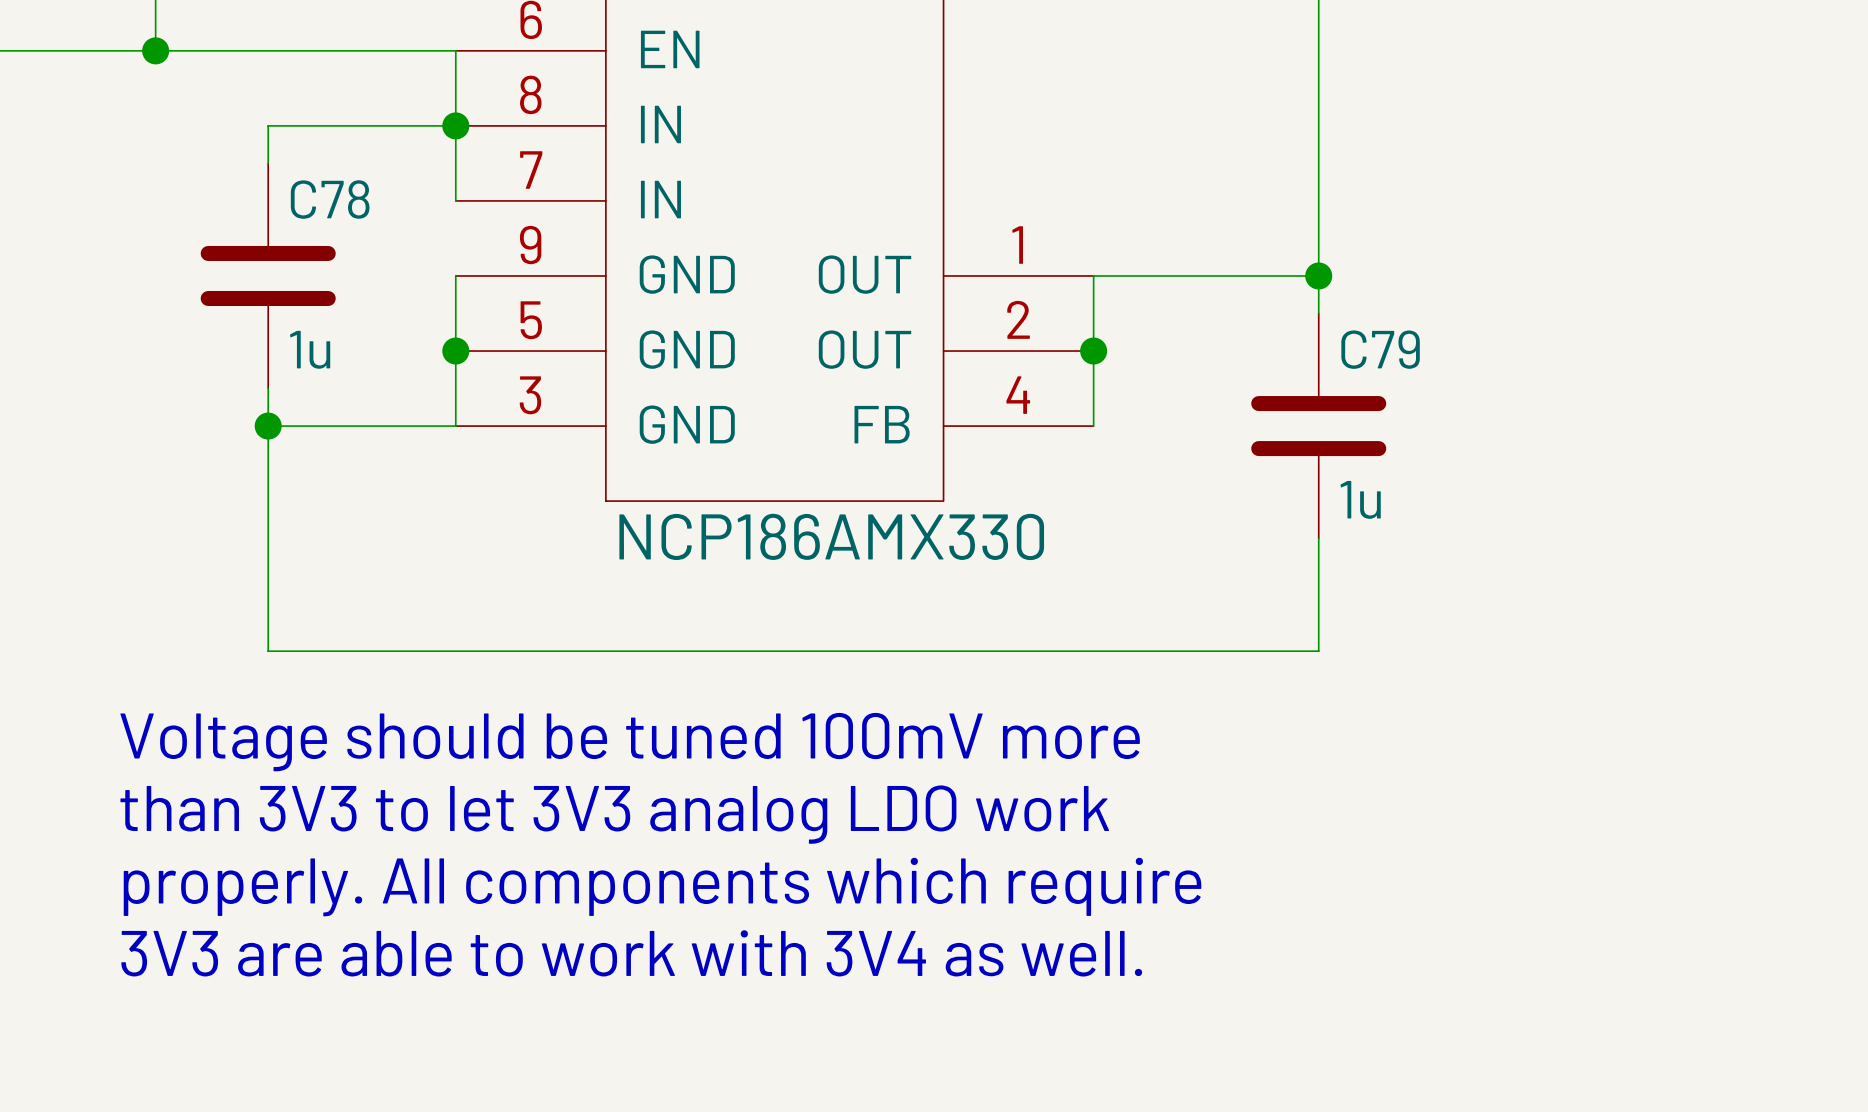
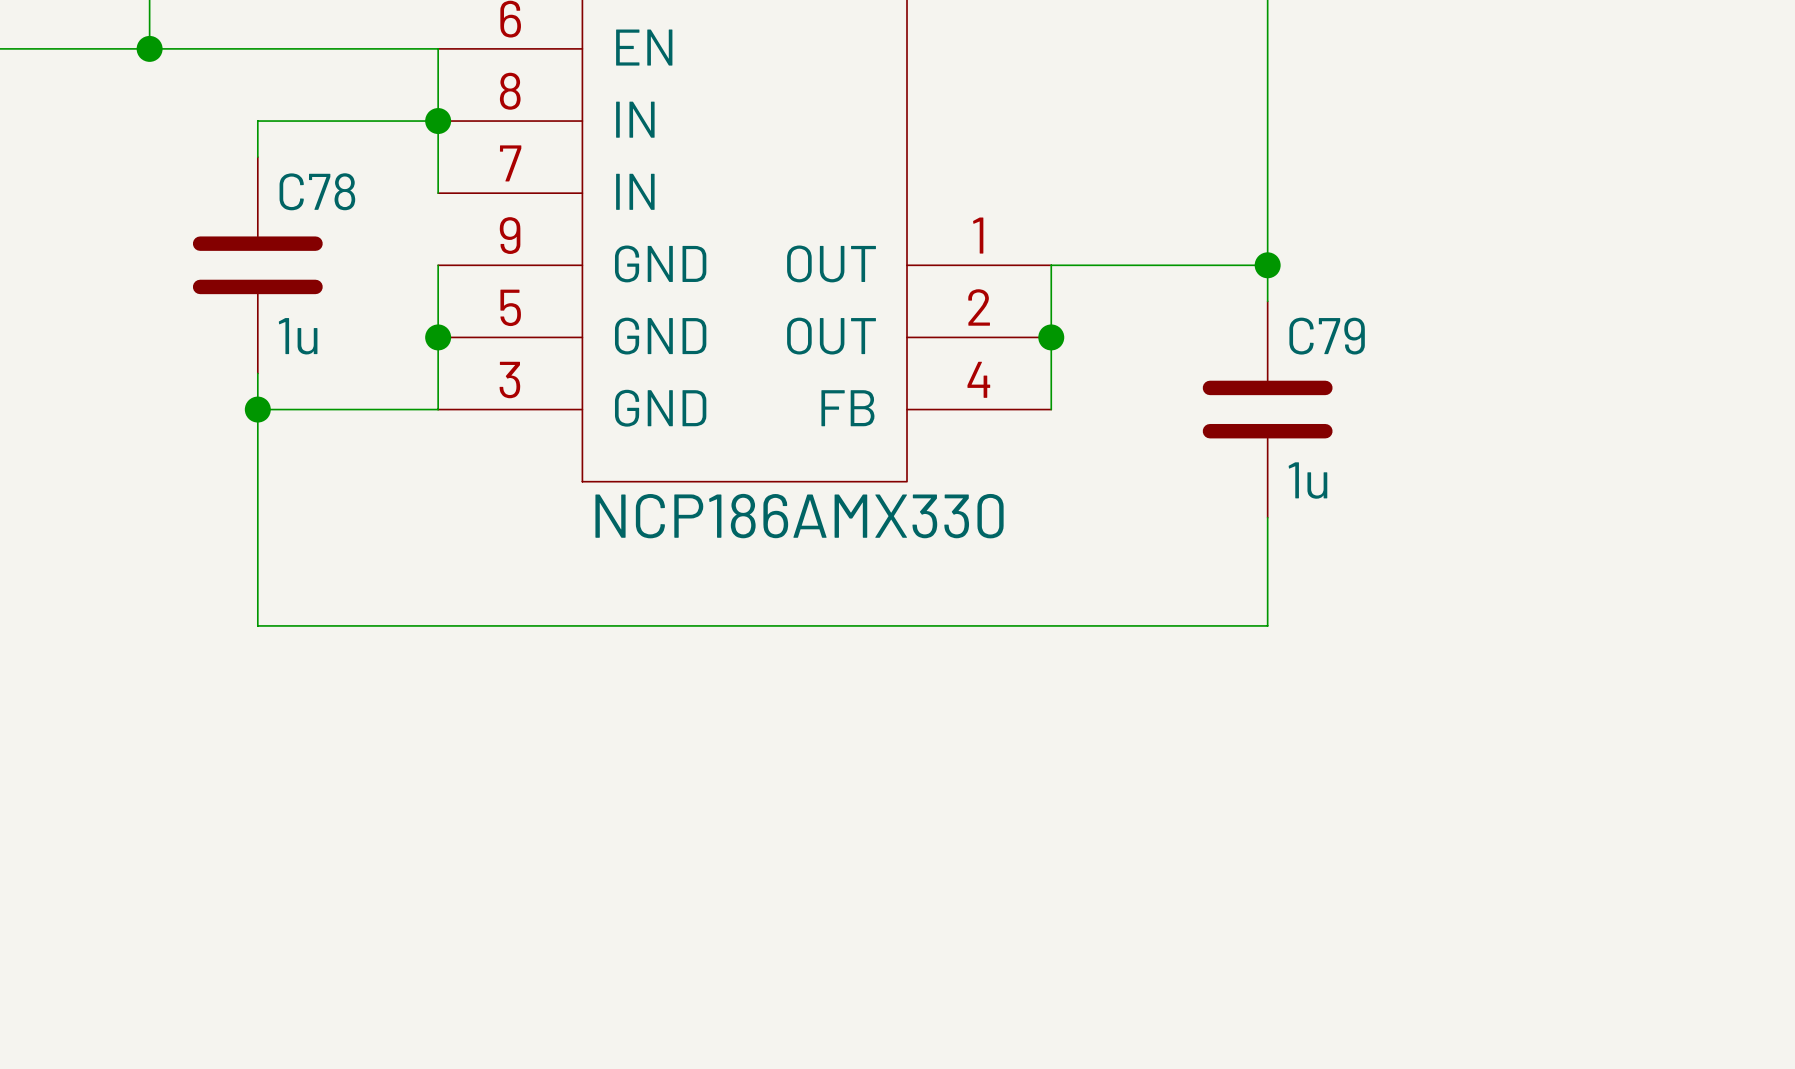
text: Voltage should be tuned 100mV more (630, 742) -> none
text: than 3V3 to let 3V3 analog LDO work (614, 814) -> none
text: properly. All components which require (662, 887) -> none
text: 3V3 are able to work with 3V4 as well. (631, 953) -> none

